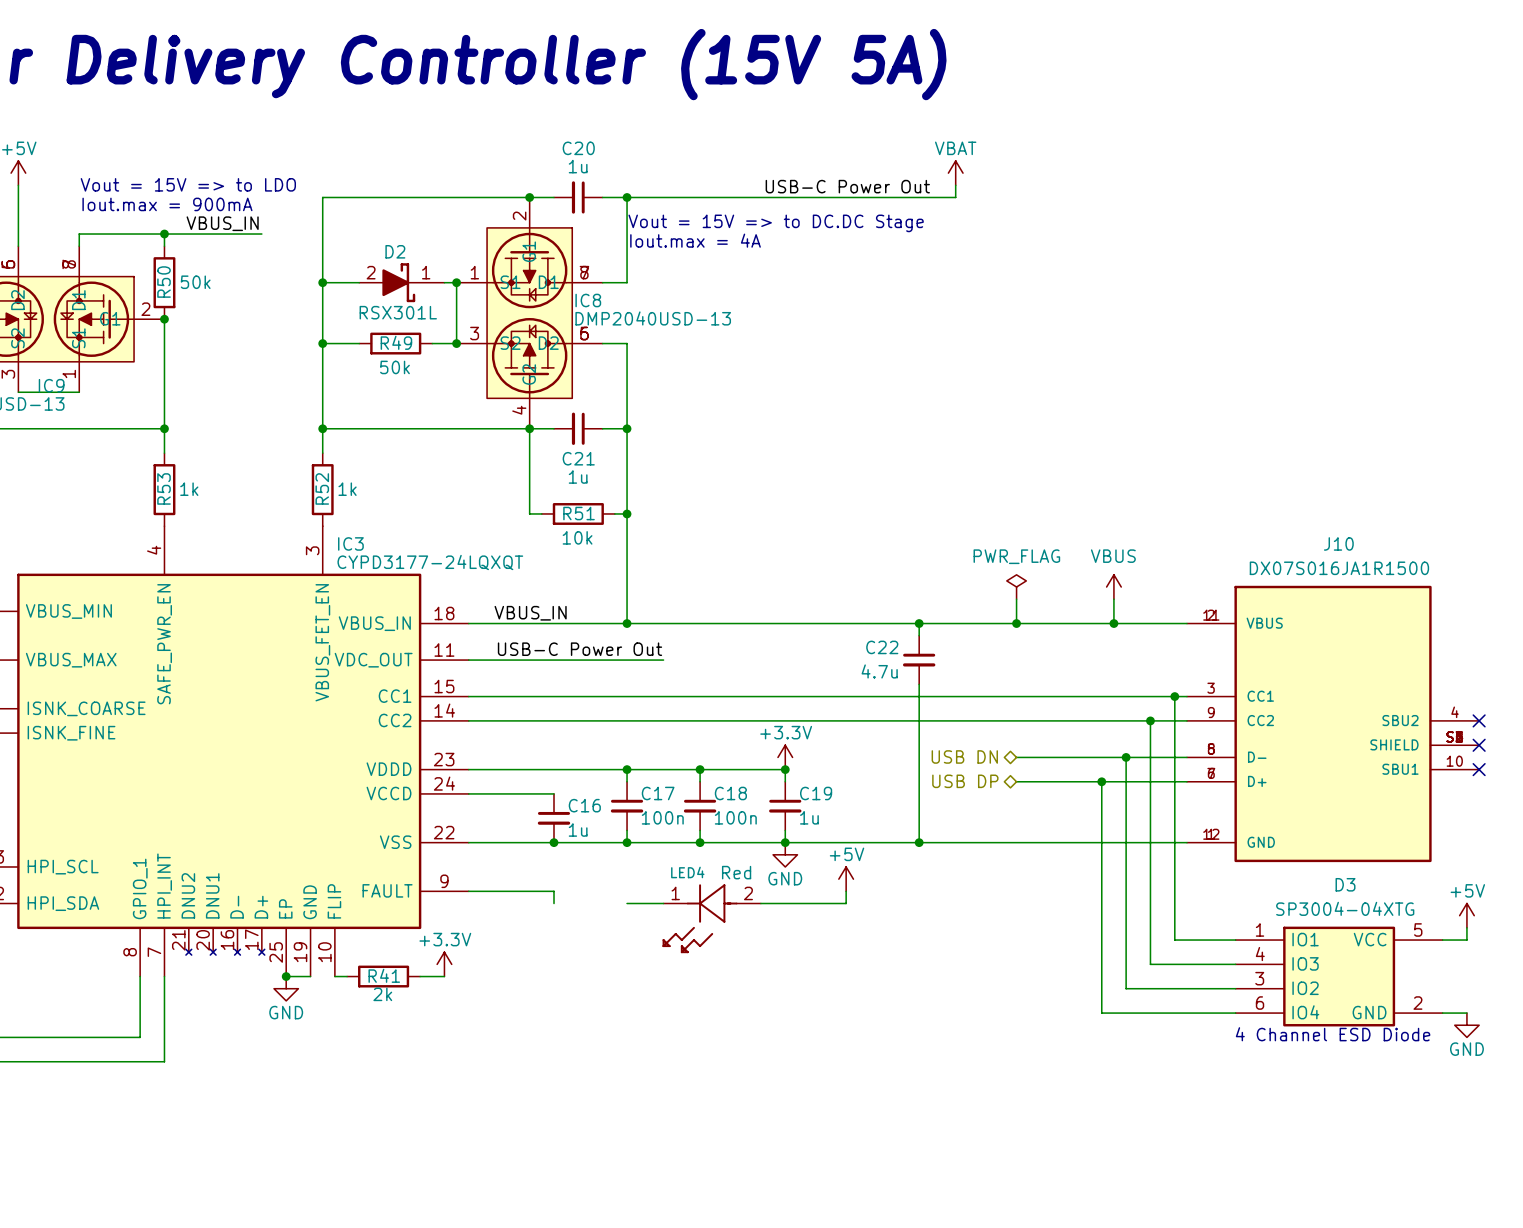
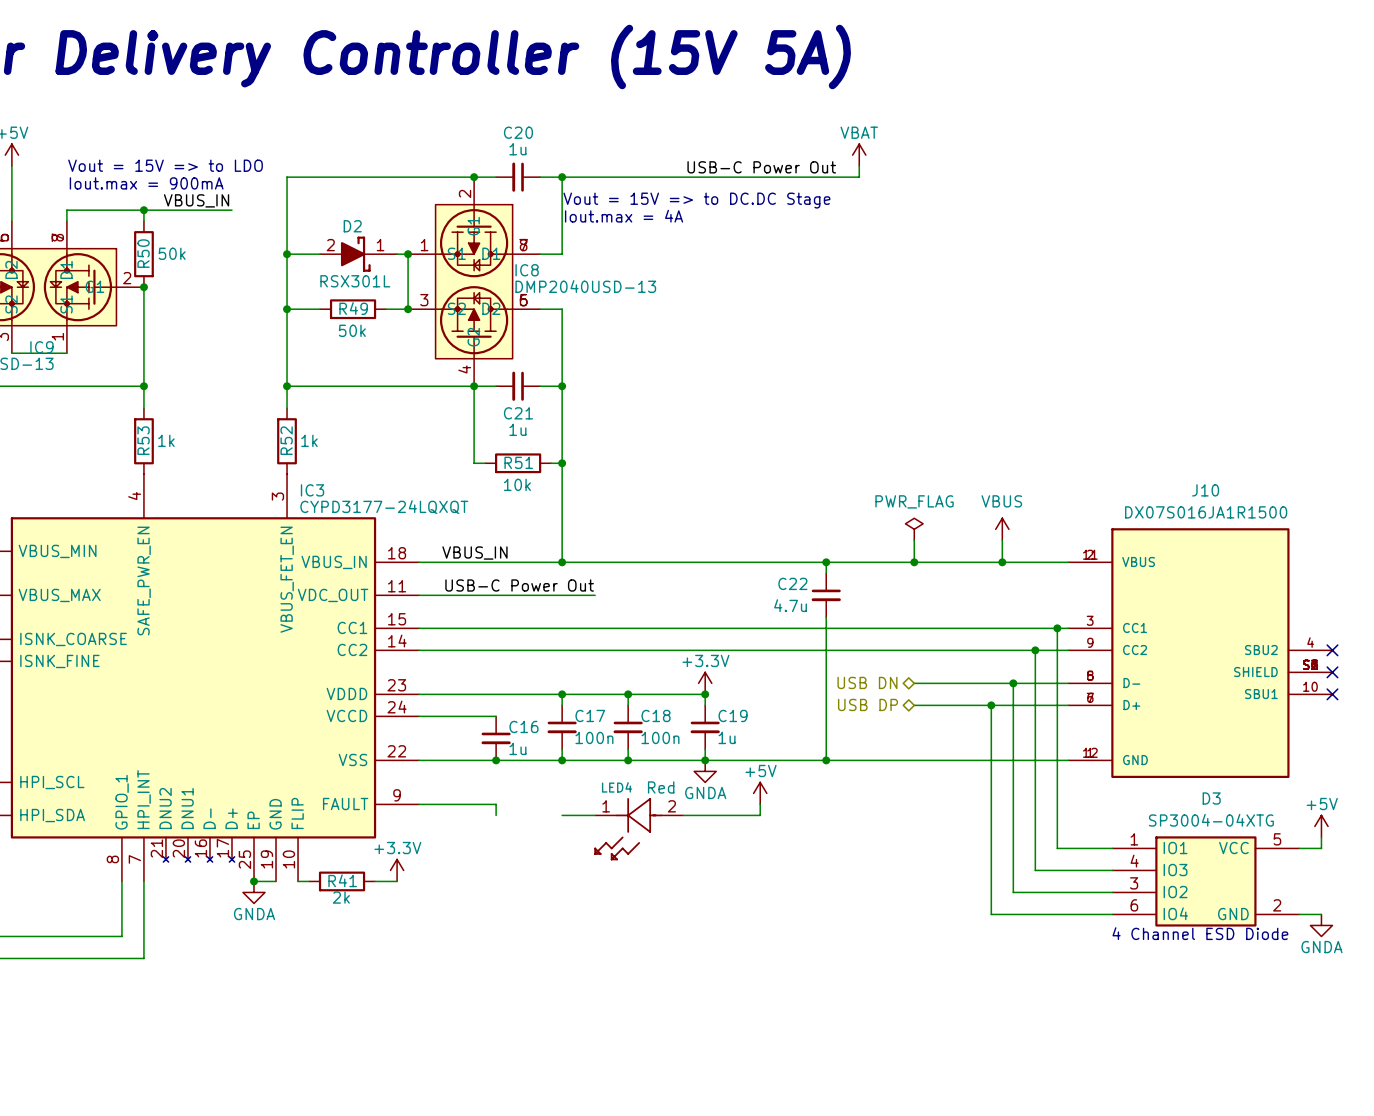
power symbol: GND (785, 854) -> GNDA (705, 771)
power symbol: GND (286, 988) -> GNDA (254, 892)
power symbol: GND (1466, 1025) -> GNDA (1321, 925)

